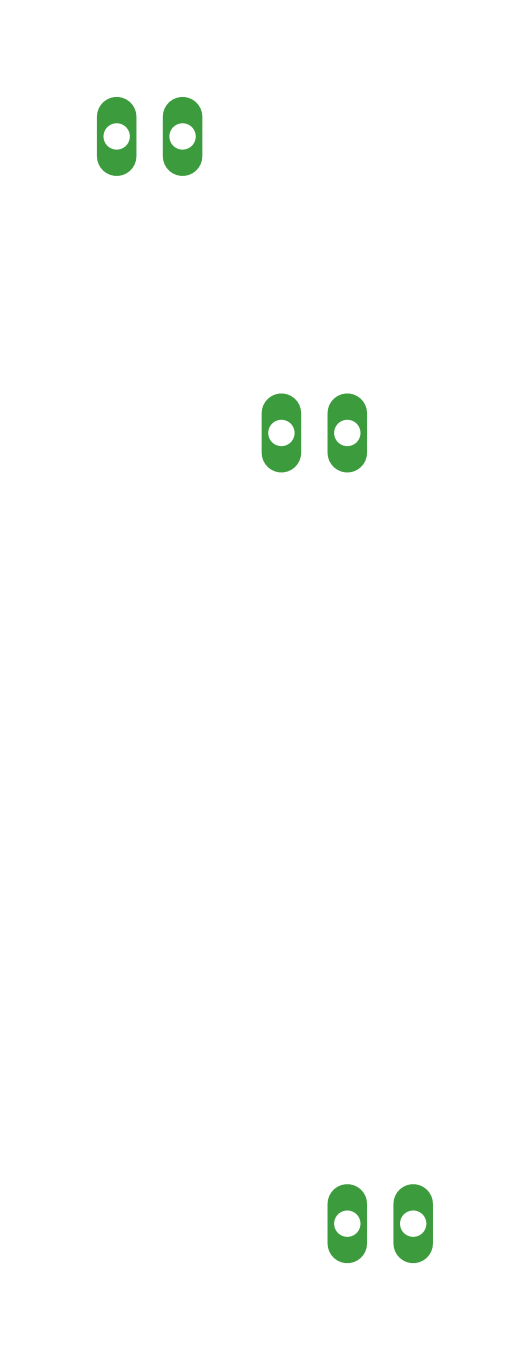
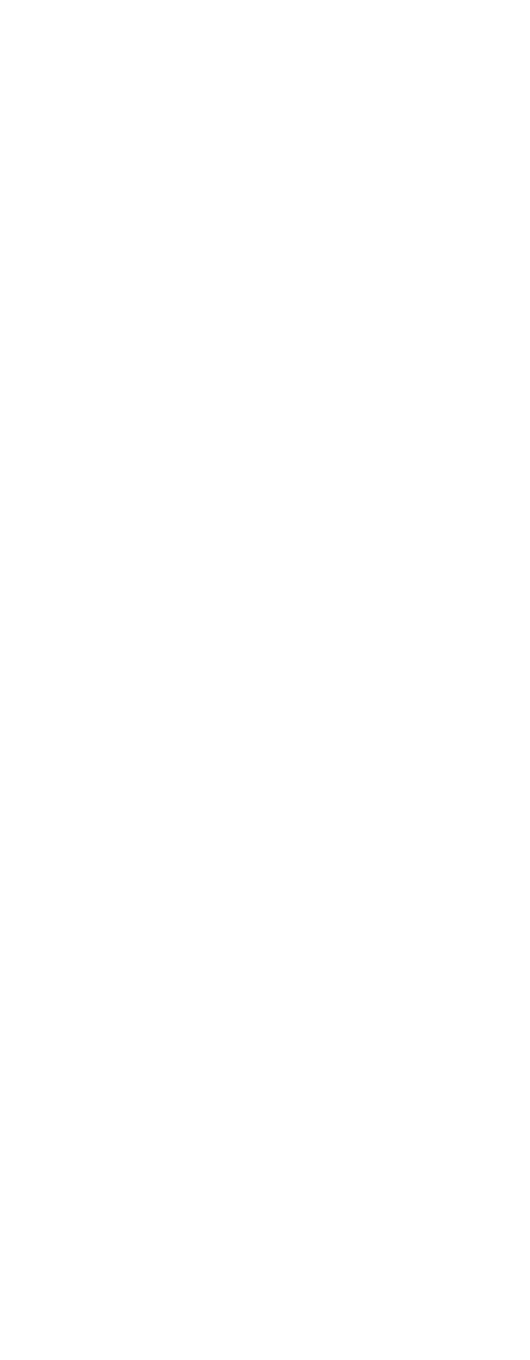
part: (149, 136) -> none
part: (314, 432) -> none
part: (380, 1223) -> none

